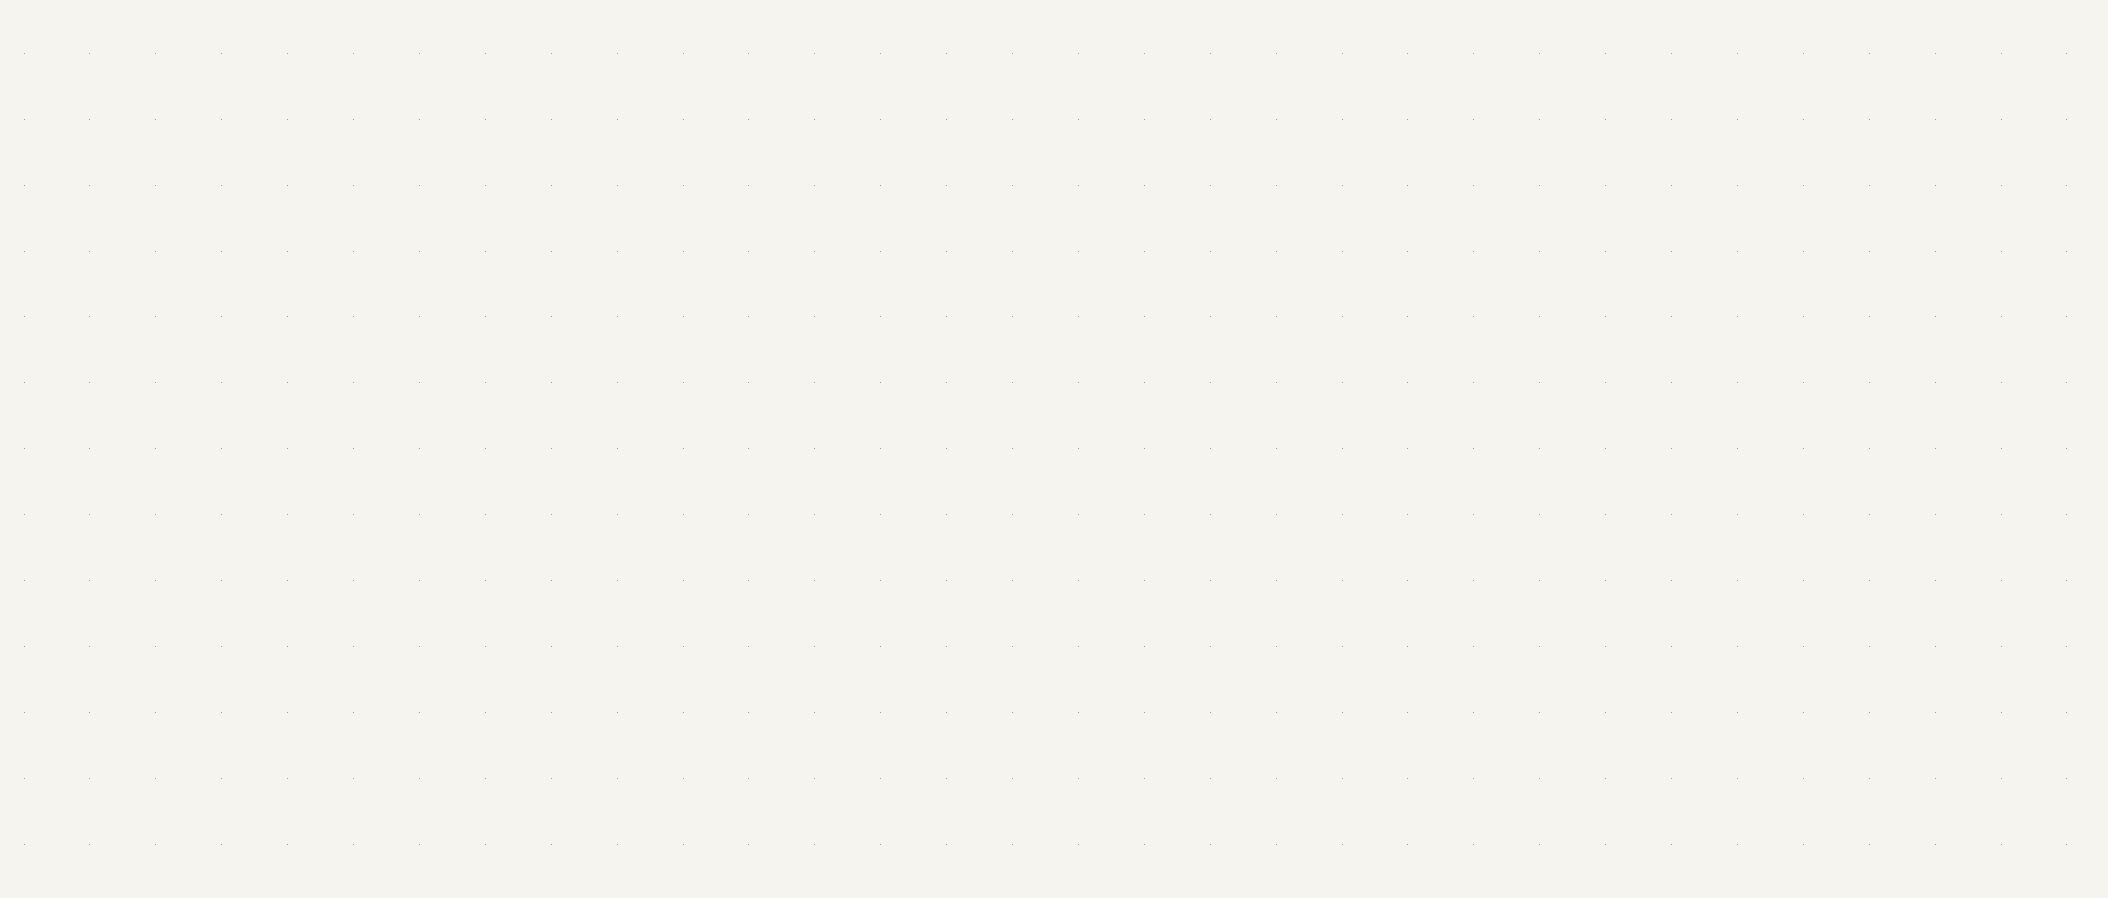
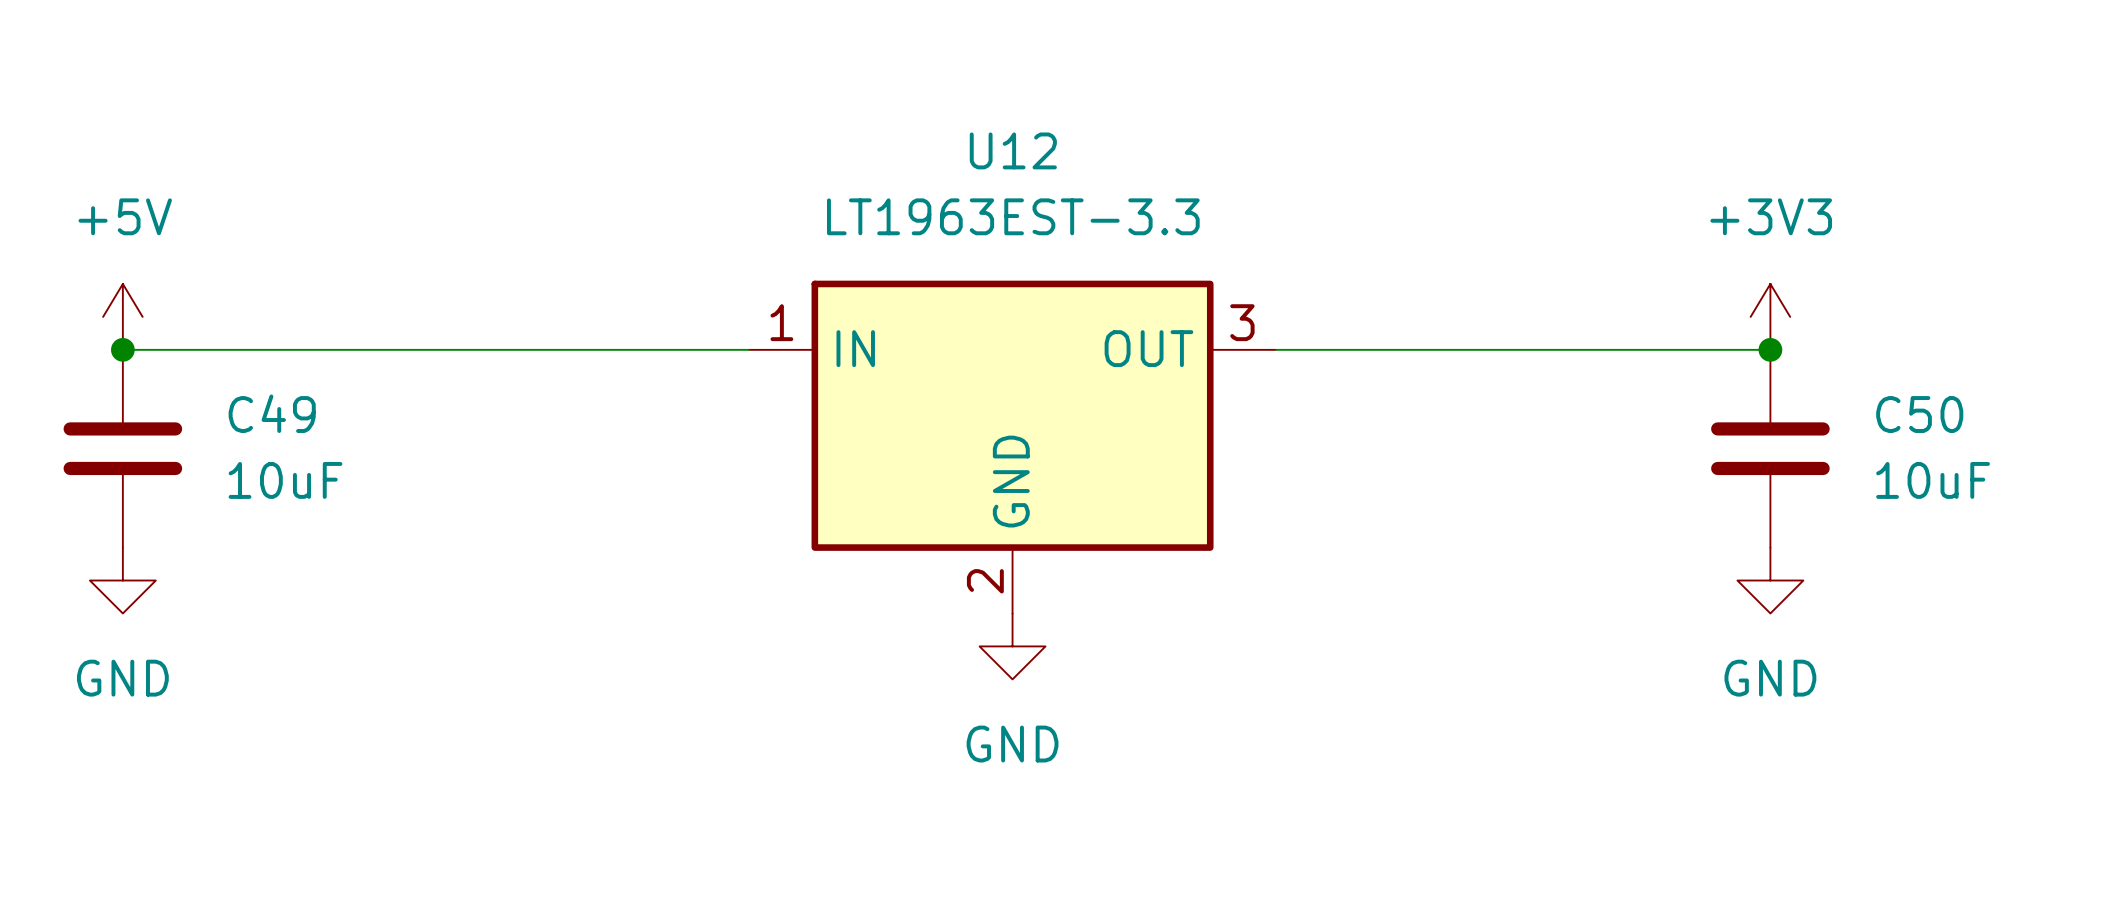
power symbol: none -> +5V (122, 316)
power symbol: none -> +3V3 (1770, 316)
wire: none -> (122, 349) (748, 349)
junction: none -> (122, 349)
wire: none -> (1276, 349) (1770, 349)
junction: none -> (1770, 349)
U12: none -> LT1963EST-3.3 (1012, 447)
C49: none -> 10uF (122, 448)
C50: none -> 10uF (1770, 448)
power symbol: none -> GND (122, 580)
power symbol: none -> GND (1770, 580)
power symbol: none -> GND (1012, 646)

